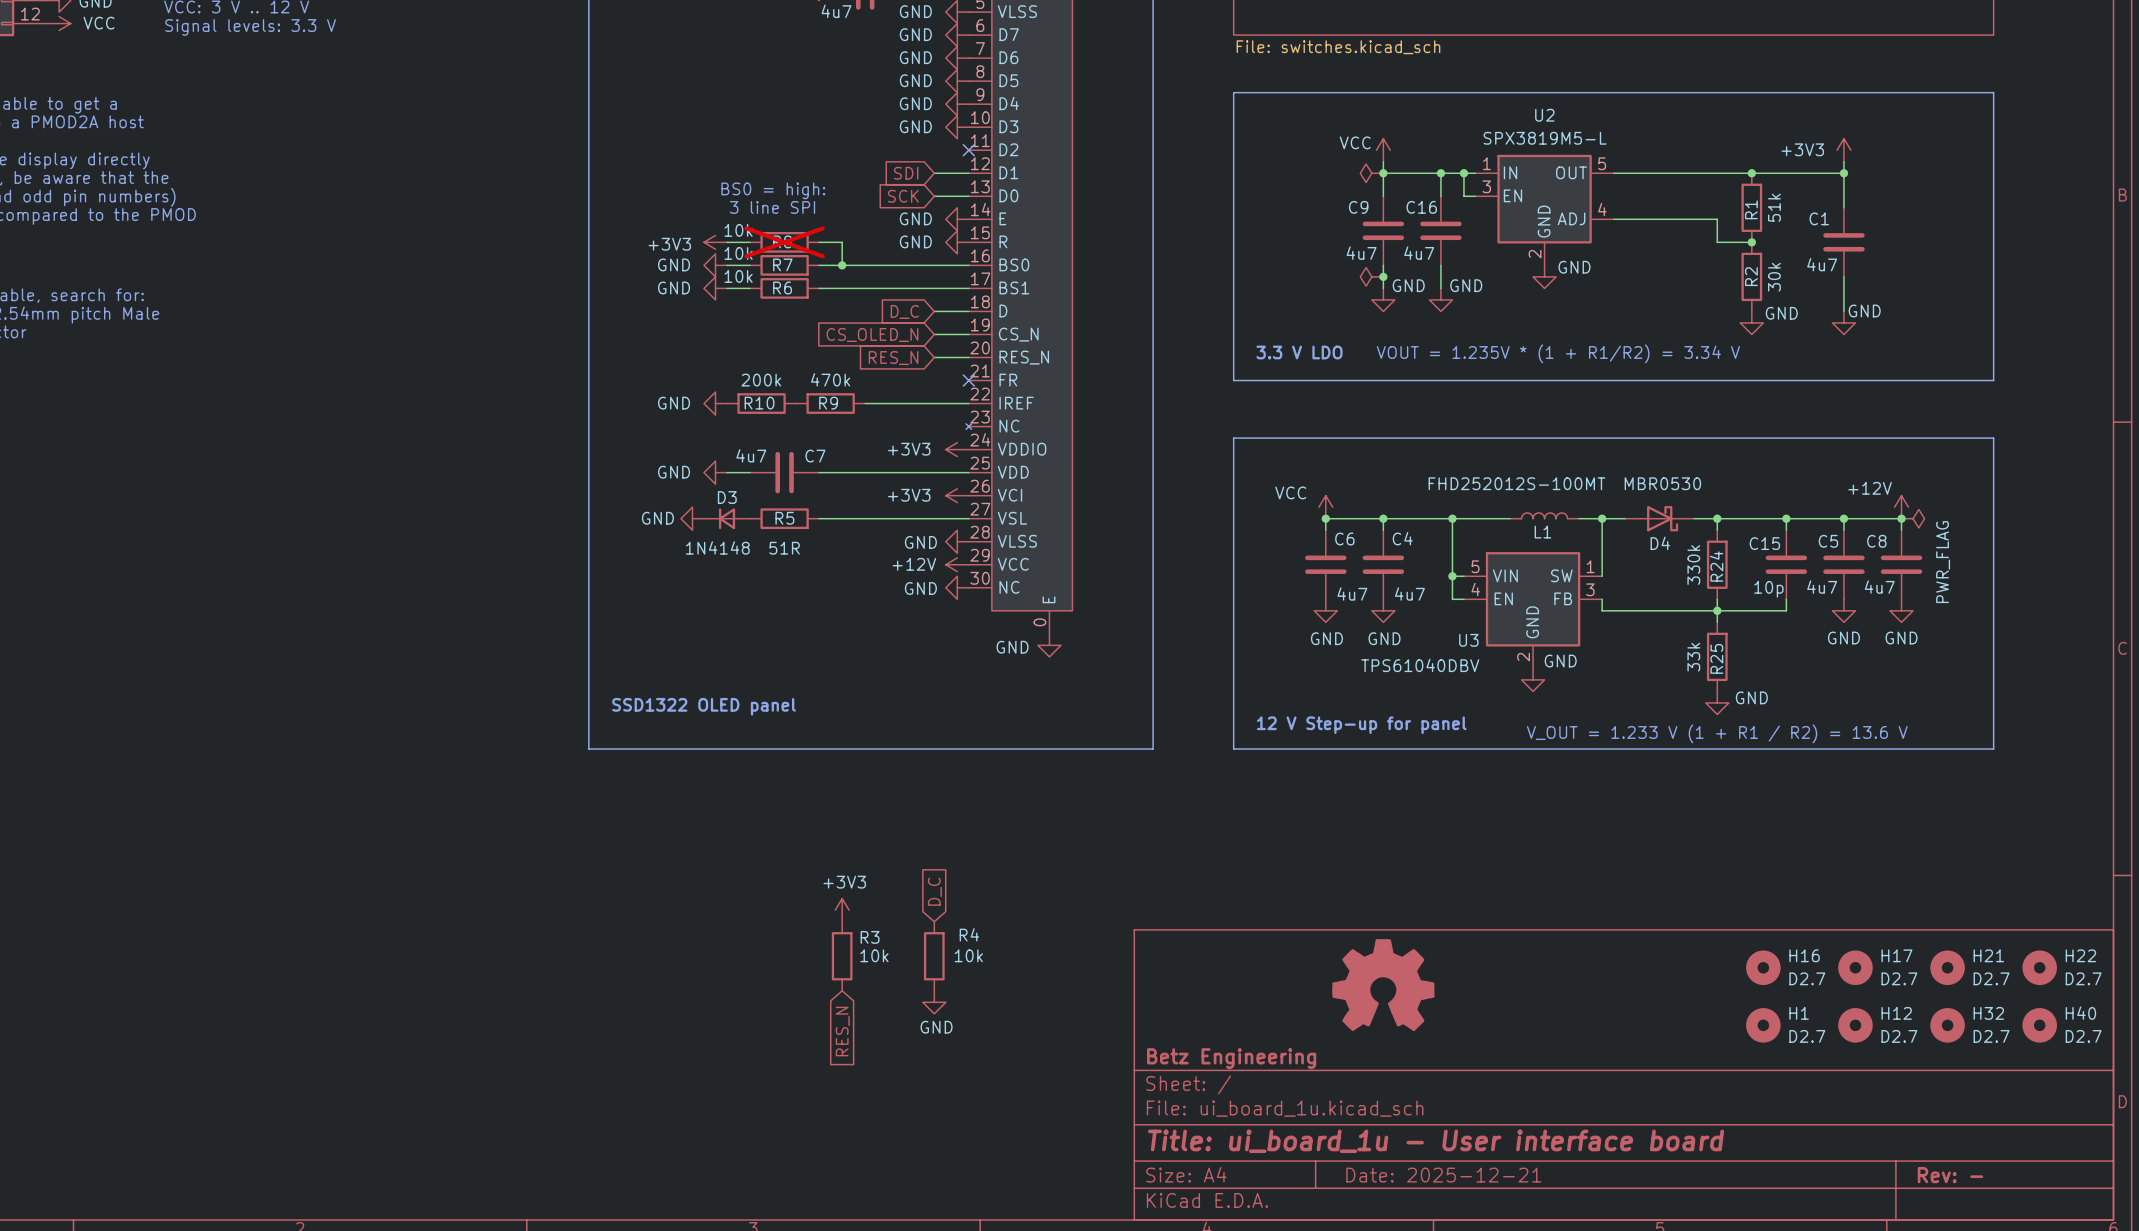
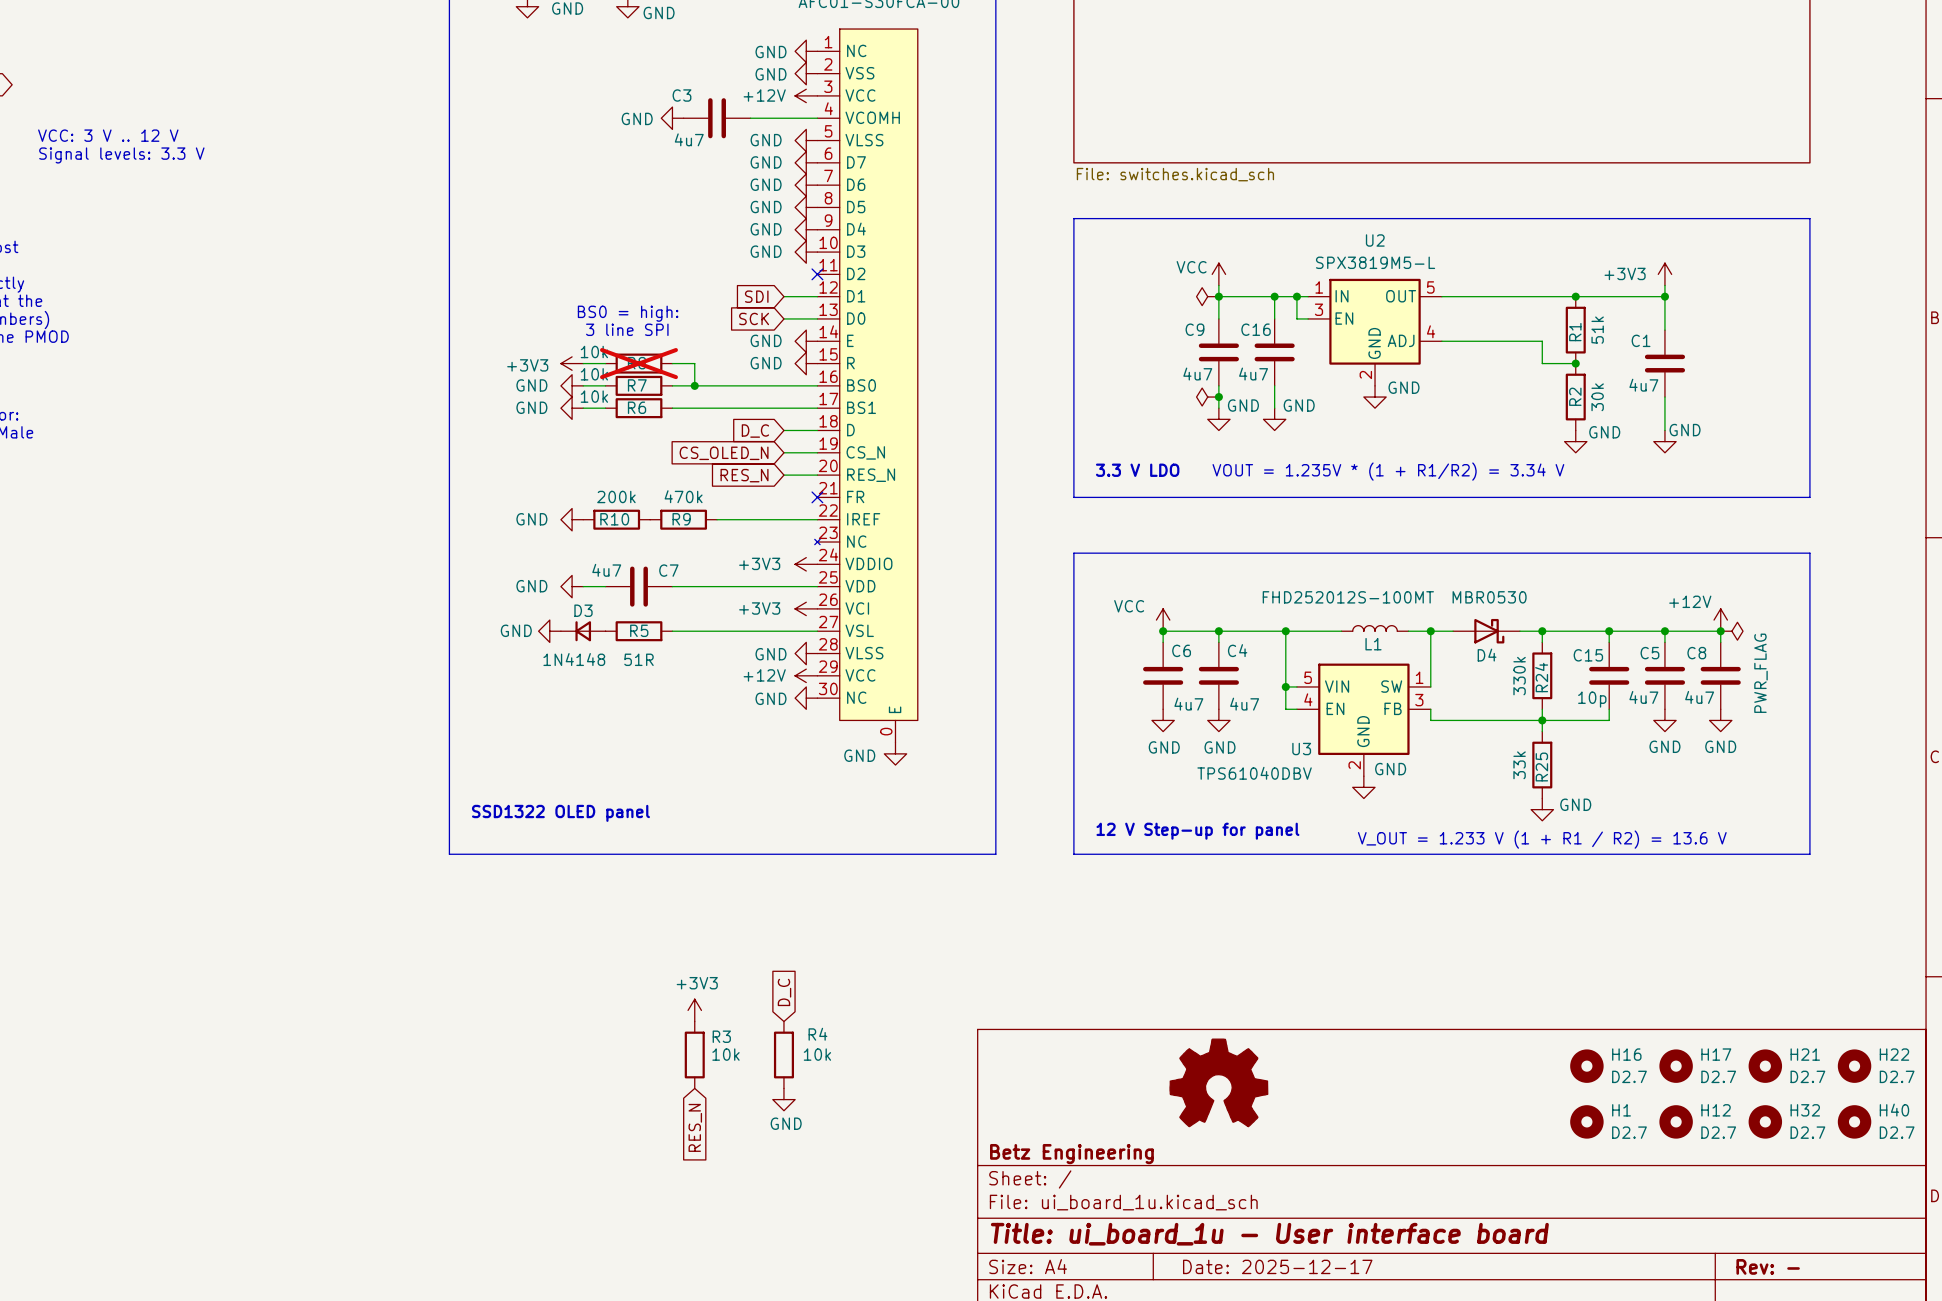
title block: Date: 2025-12-21 (1443, 1175) -> Date: 2025-12-17 (1277, 1266)

